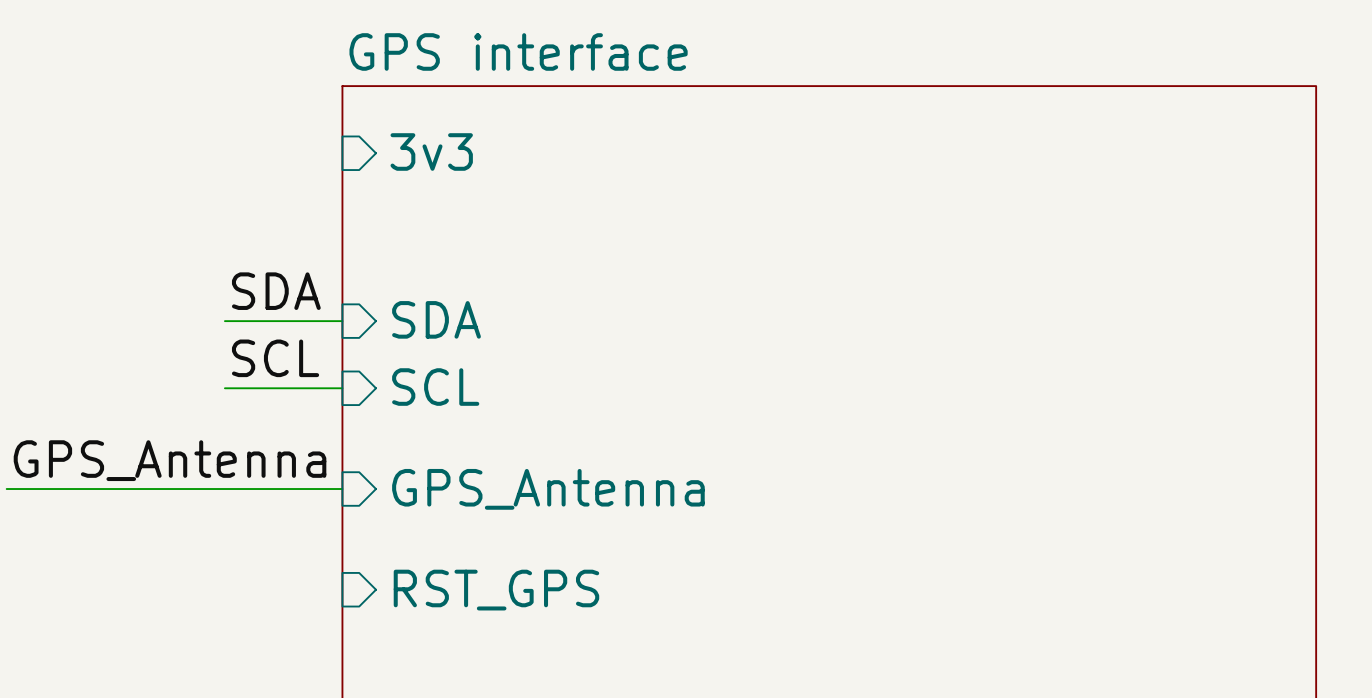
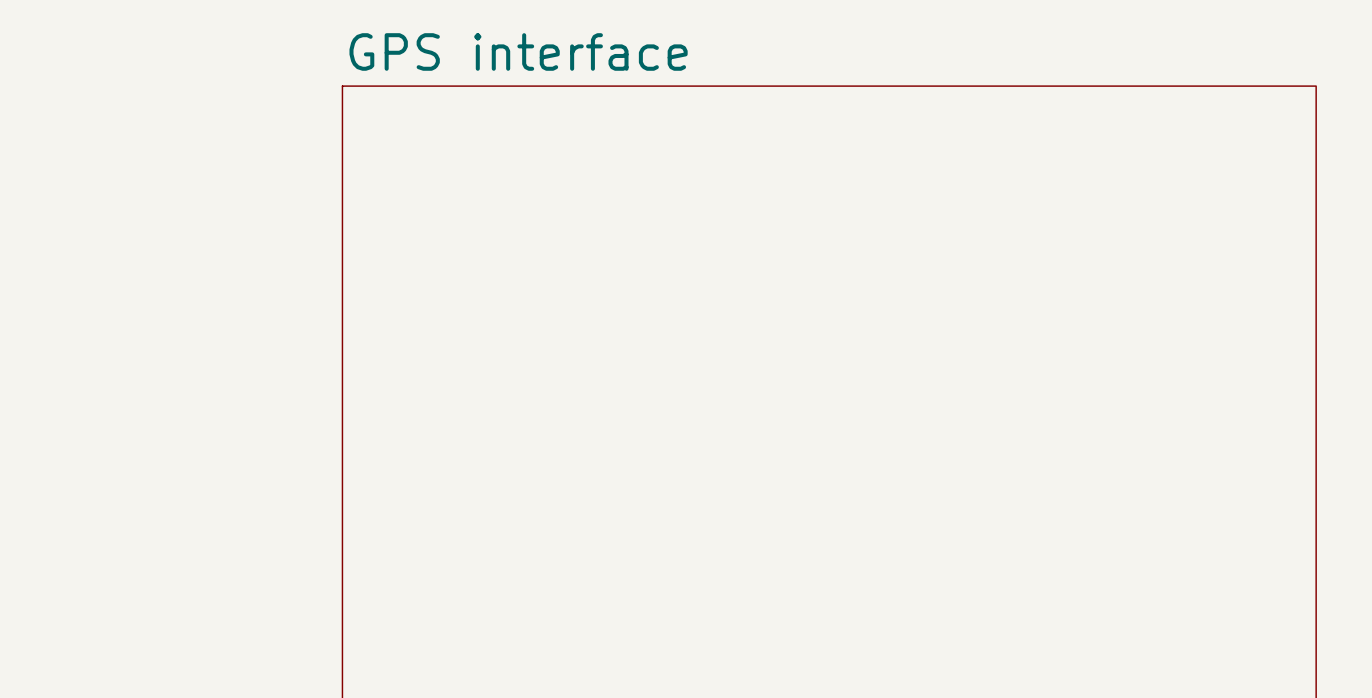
sheet pin: 3v3 (431, 151) -> none
label: SDA (276, 291) -> none
sheet pin: SDA (436, 319) -> none
wire: (224, 321) (342, 321) -> none
label: SCL (275, 358) -> none
sheet pin: SCL (435, 387) -> none
wire: (224, 388) (342, 388) -> none
label: GPS_Antenna (170, 460) -> none
wire: (6, 489) (342, 489) -> none
sheet pin: GPS_Antenna (548, 489) -> none
sheet pin: RST_GPS (496, 590) -> none

